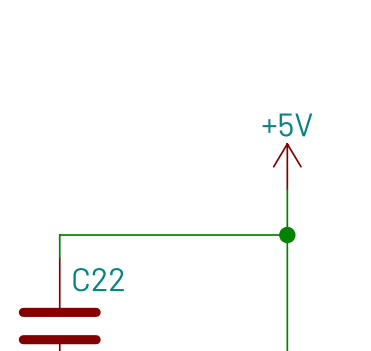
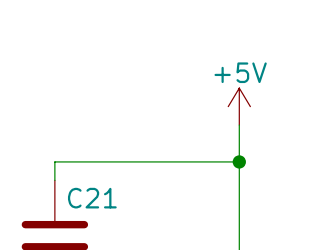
C22 name: C22 (98, 279) -> C21 (92, 198)

